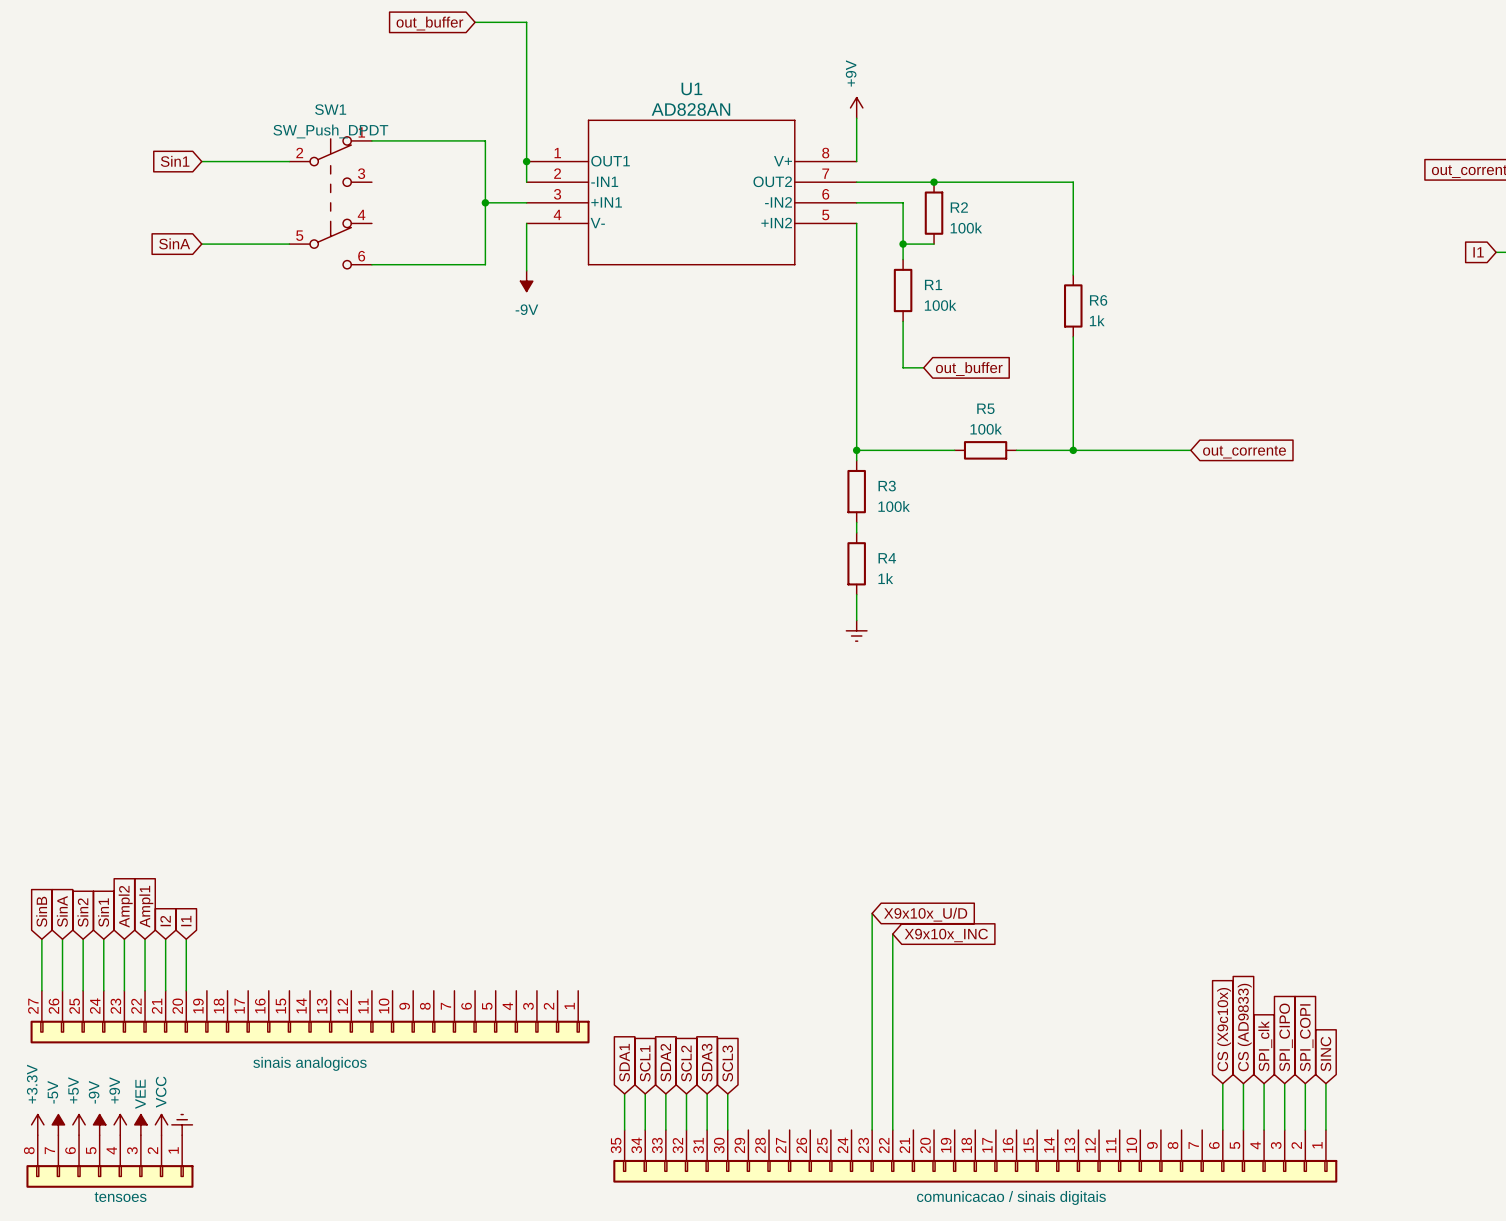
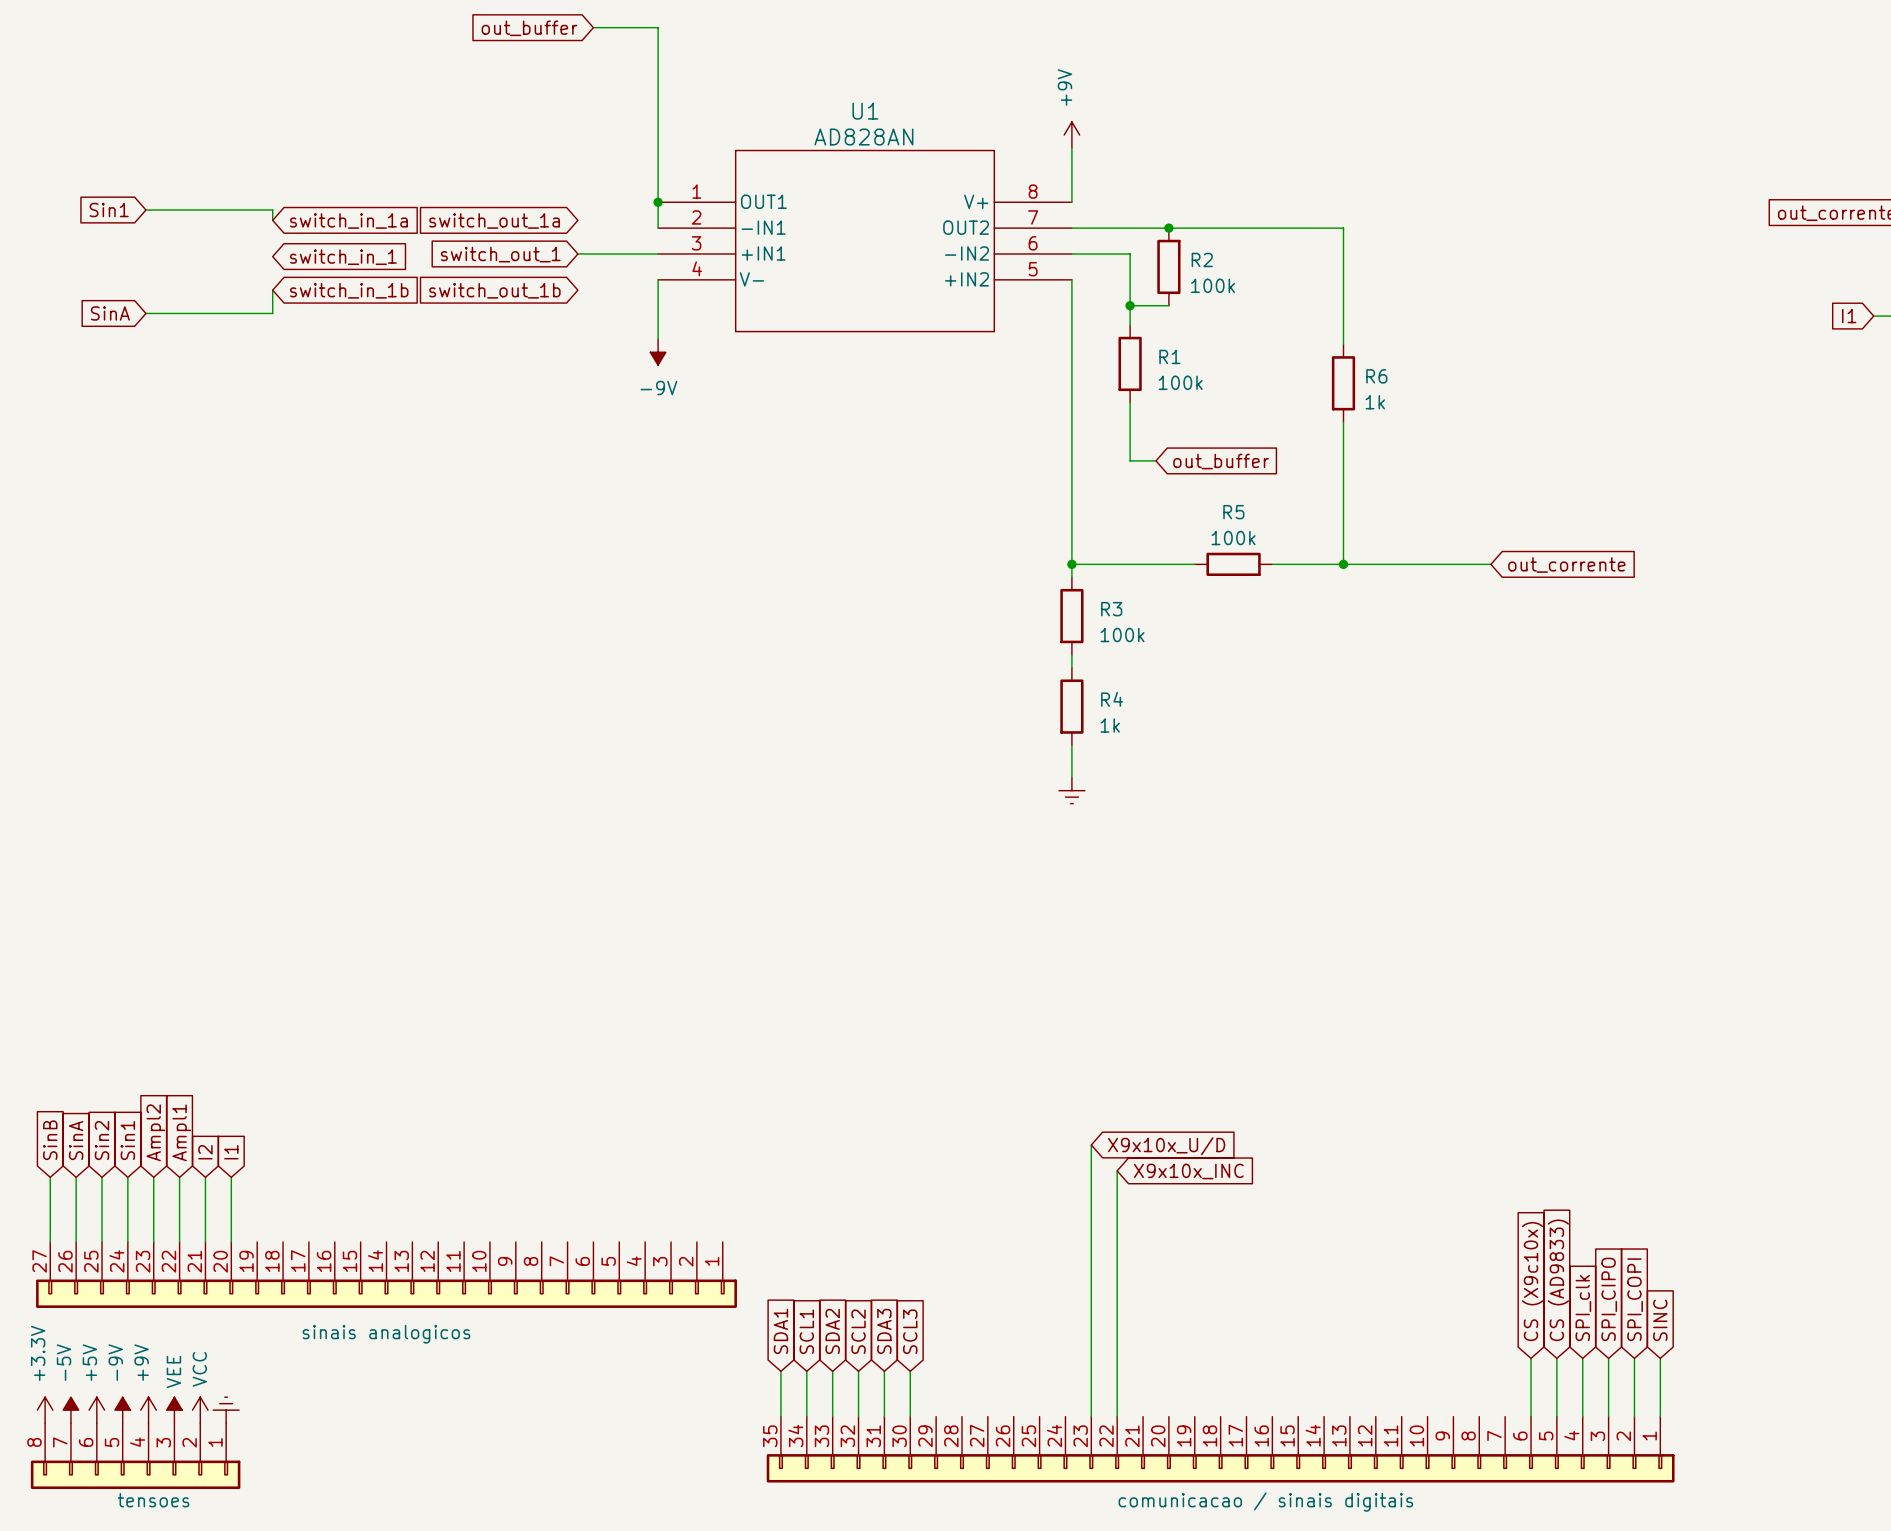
wire: (371, 140) (485, 140) (485, 264) (371, 264) -> none
global label position: Sin1 (175, 161) -> Sin1 (109, 210)
wire: (201, 161) (289, 161) -> none
wire: none -> (145, 210) (272, 210) (272, 220)
global label: none -> switch_in_1a (348, 220)
global label: none -> switch_out_1a (494, 220)
SW1: SW_Push_DPDT (330, 202) -> none
wire: none -> (577, 253) (606, 253)
junction: (485, 202) -> none
global label: none -> switch_out_1 (500, 254)
global label: none -> switch_in_1 (343, 257)
wire: none -> (272, 290) (272, 313) (145, 313)
global label: none -> switch_in_1b (349, 290)
global label: none -> switch_out_1b (494, 290)
global label position: SinA (174, 243) -> SinA (110, 313)
wire: (201, 244) (289, 244) -> none

